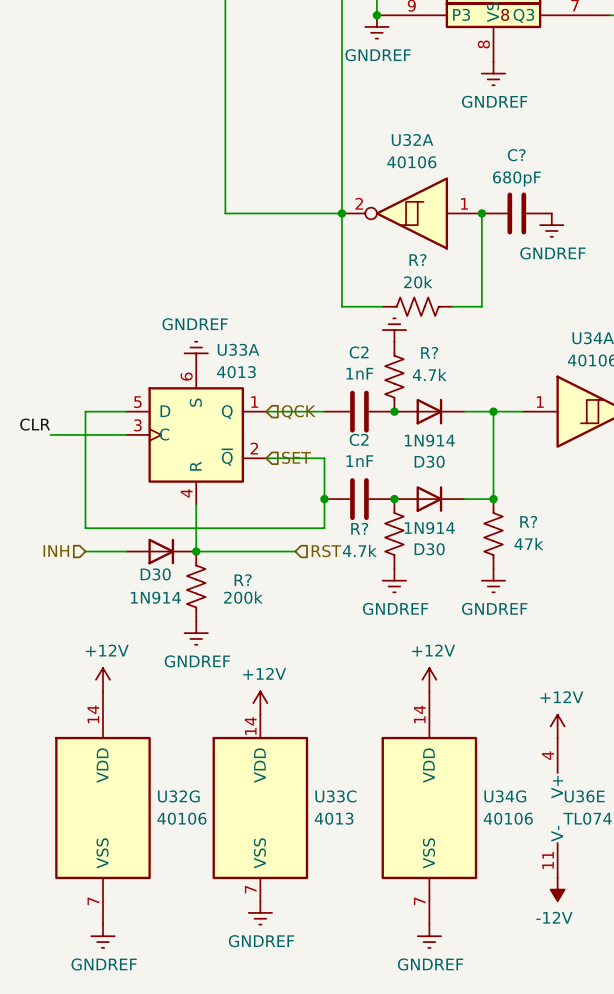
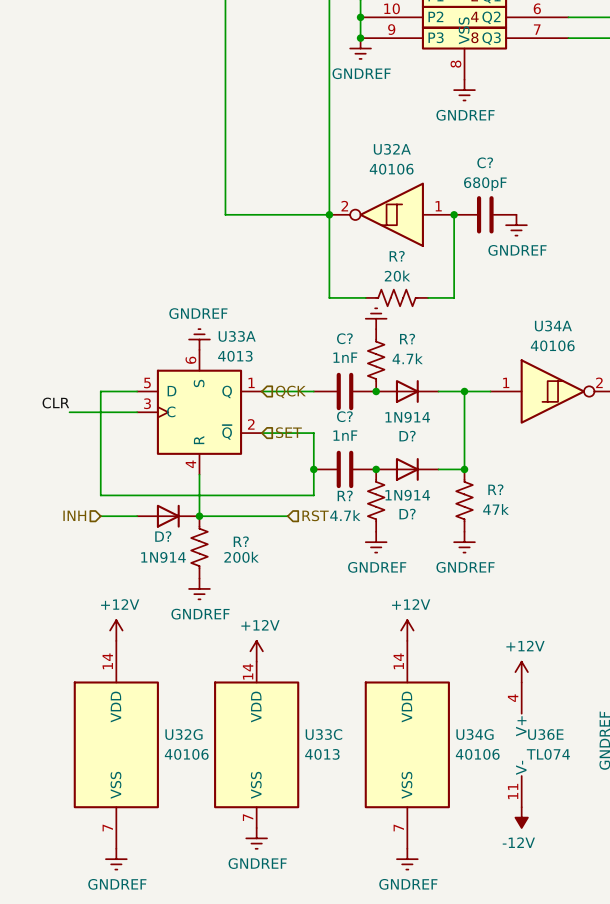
C2 name: C2 (359, 352) -> C? (344, 338)
C2 name: C2 (359, 439) -> C? (344, 416)
D30 name: D30 (429, 461) -> D? (407, 436)
D30 name: D30 (429, 549) -> D? (407, 514)
D30 name: D30 (155, 574) -> D? (163, 536)

